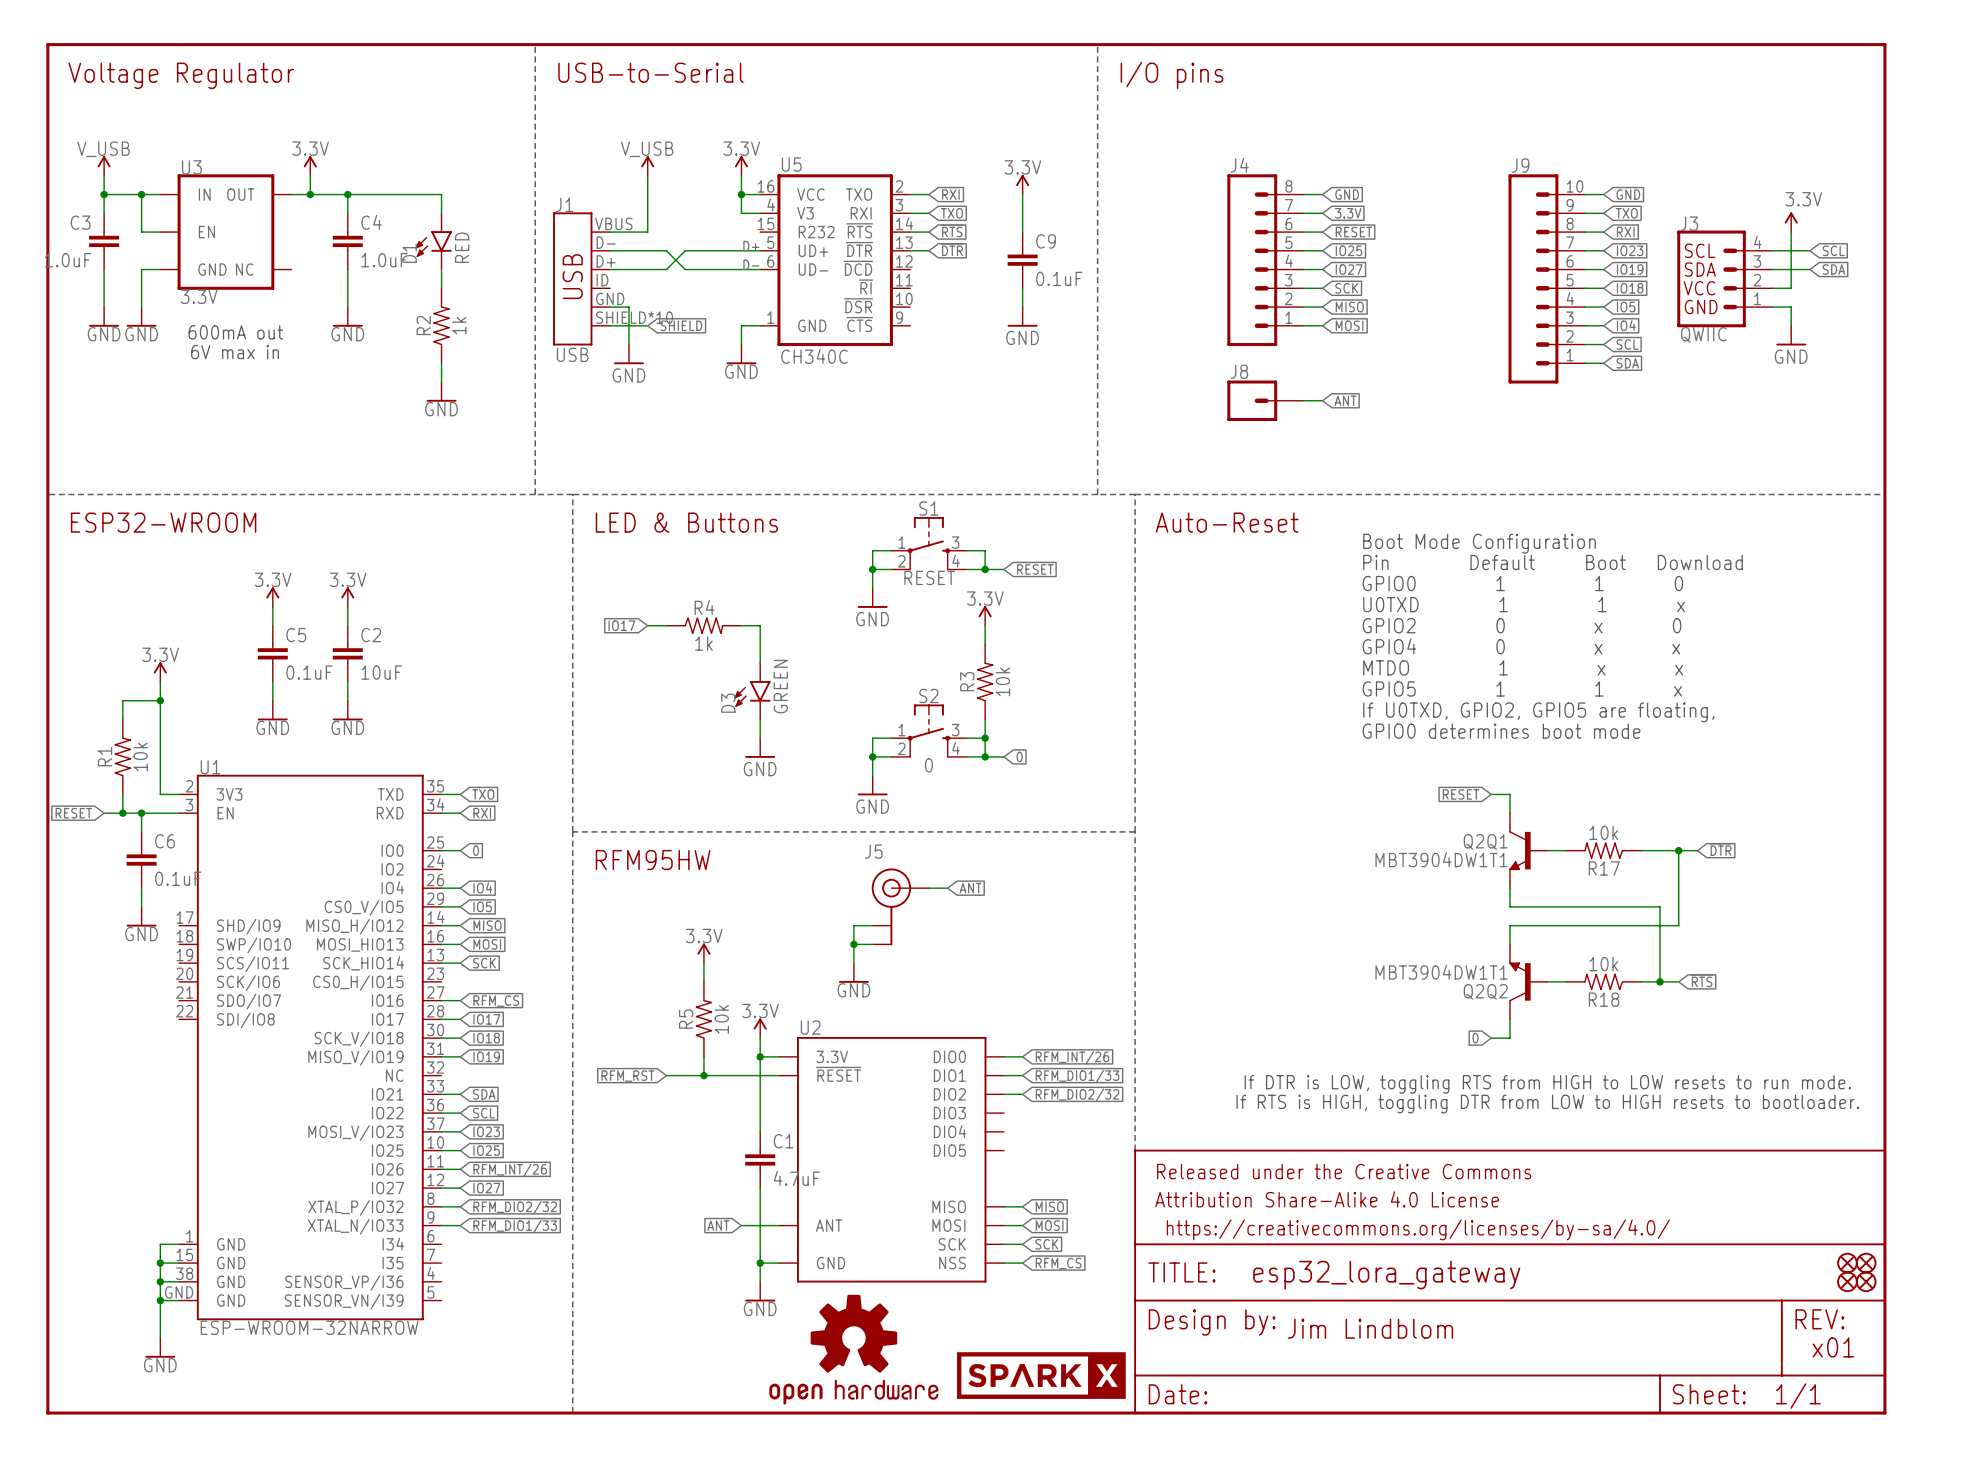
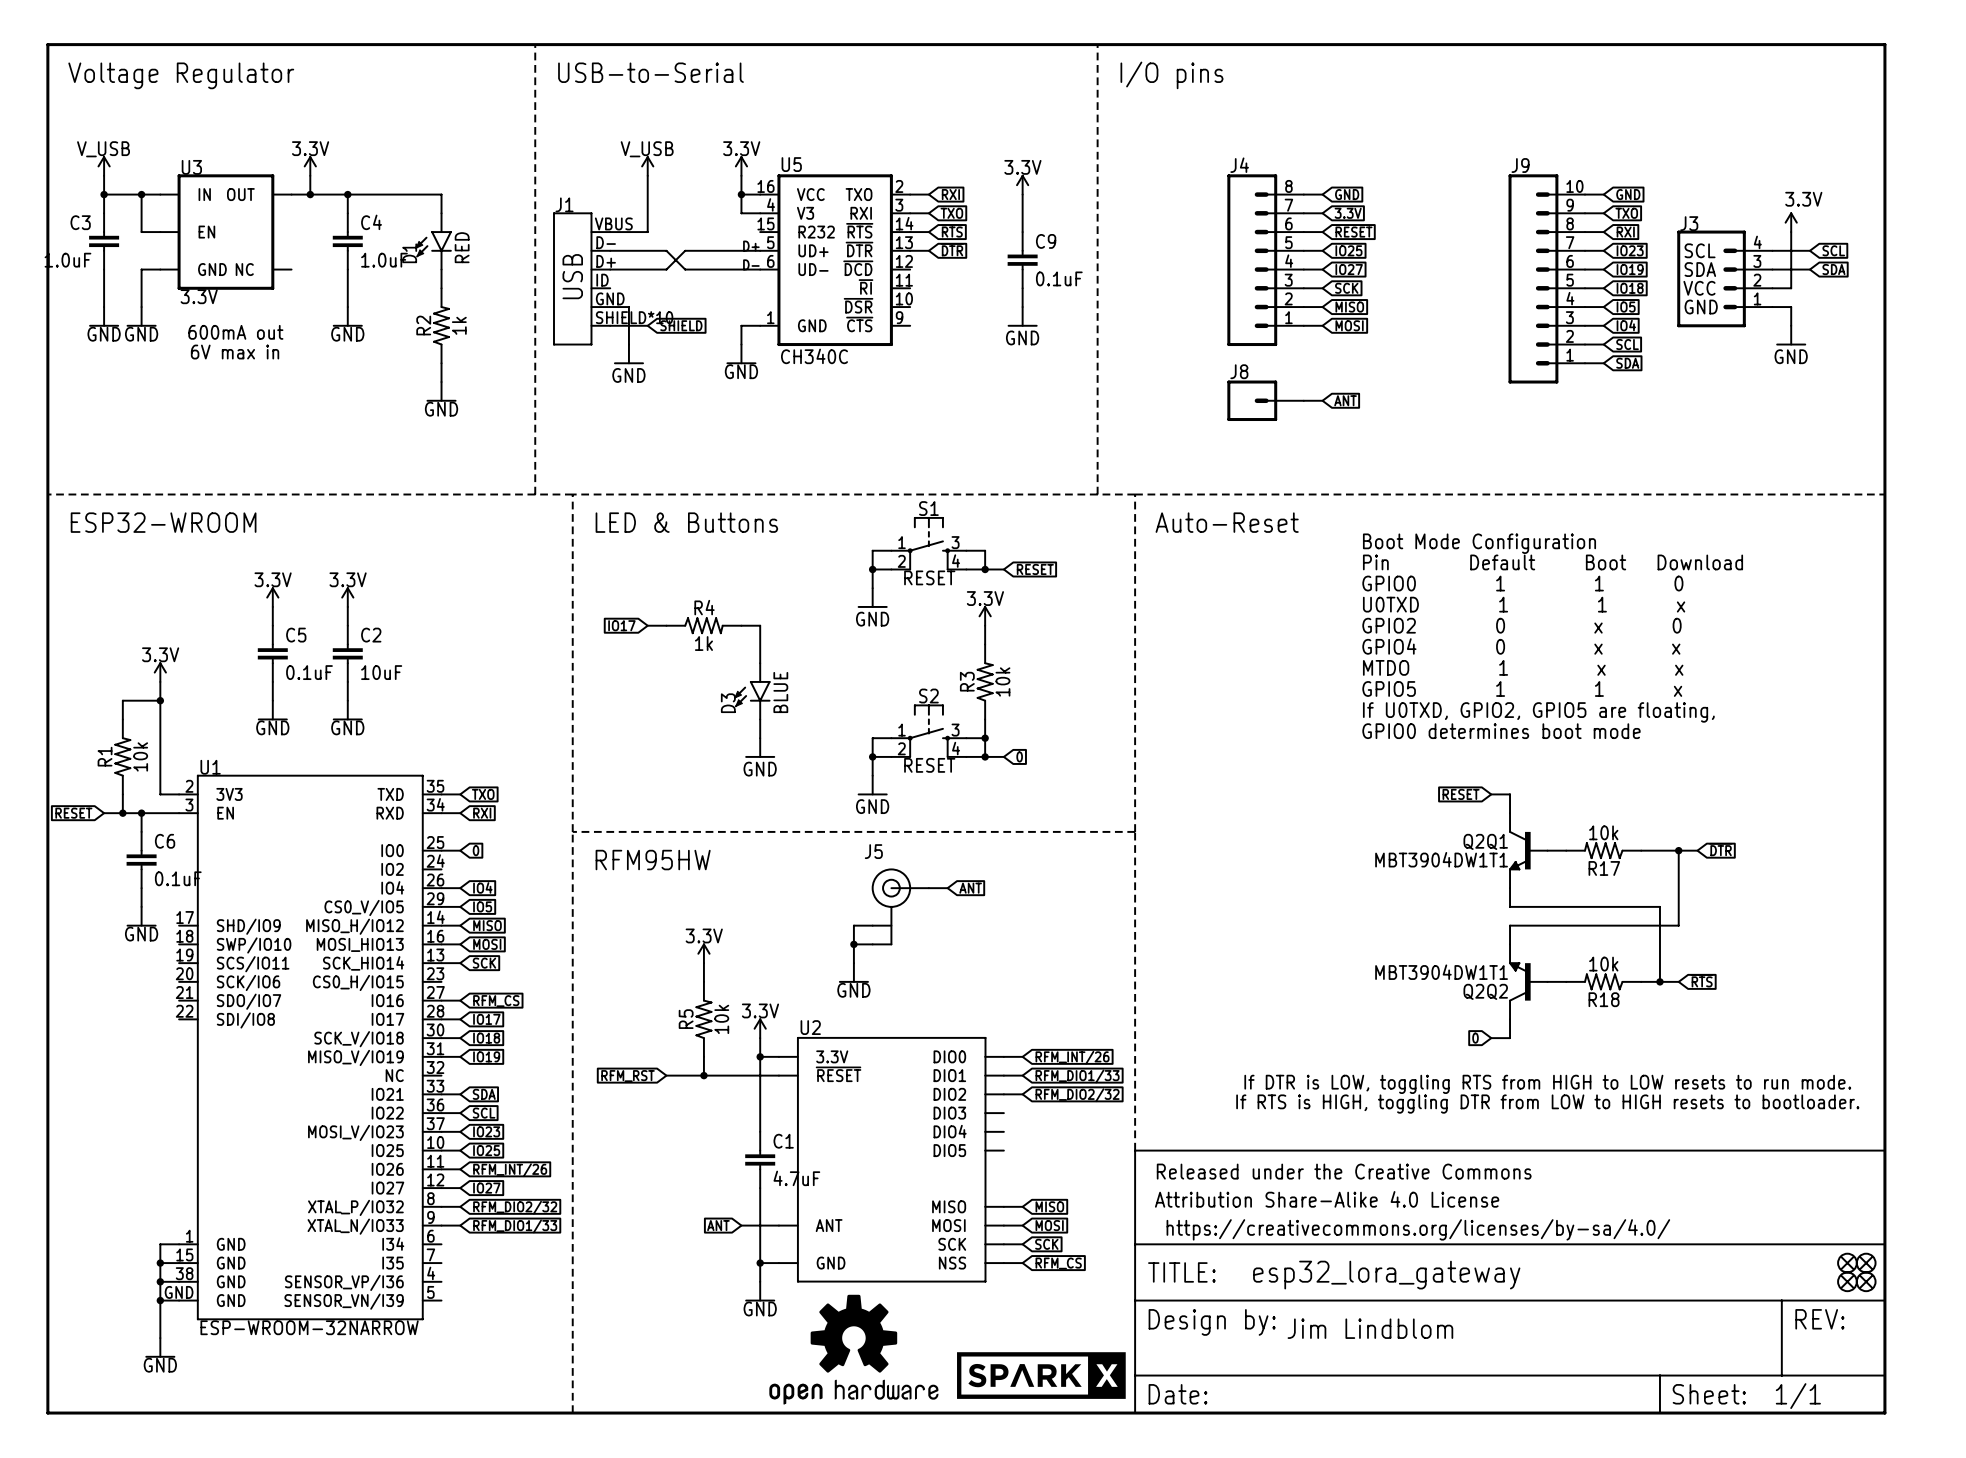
J3 value: QWIIC (1703, 334) -> none
J1 value: USB (572, 354) -> none
D3 value: GREEN (780, 686) -> BLUE (780, 692)
S2 value: 0 (928, 765) -> RESET (929, 765)
text: x01 (1833, 1347) -> none

